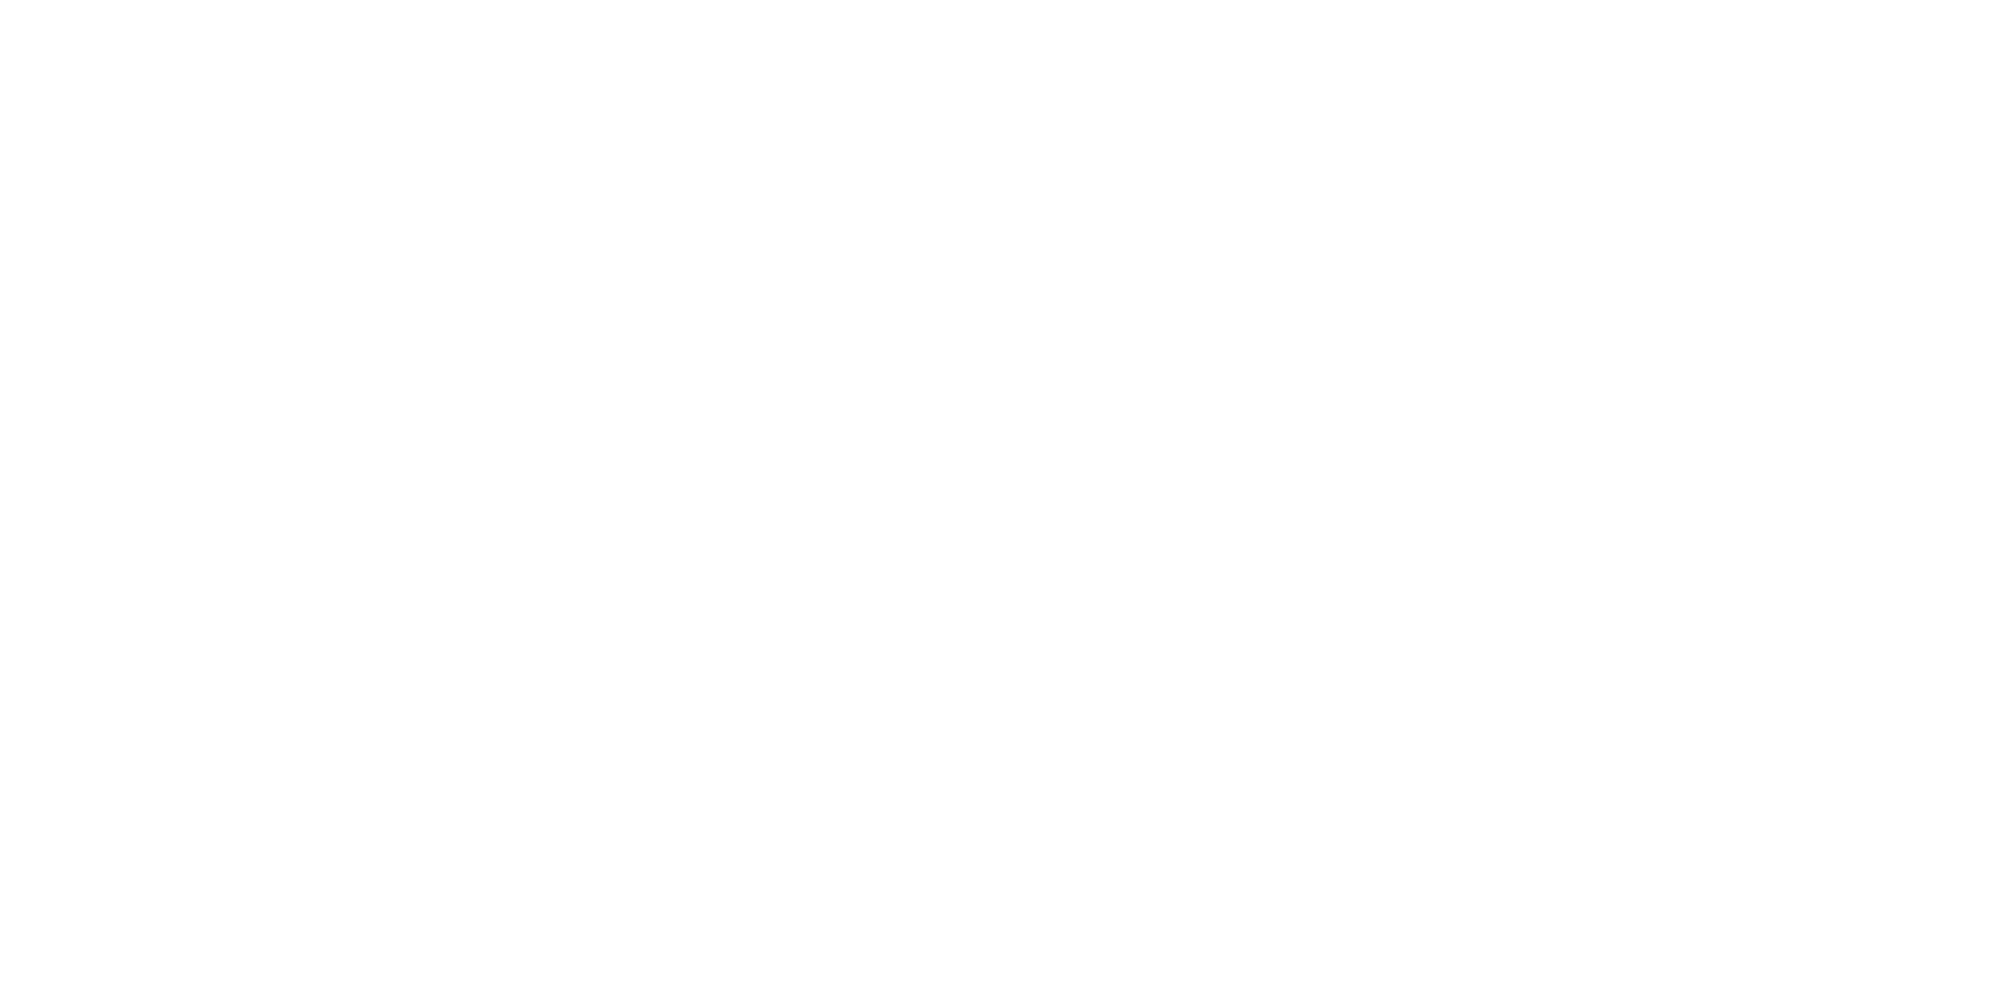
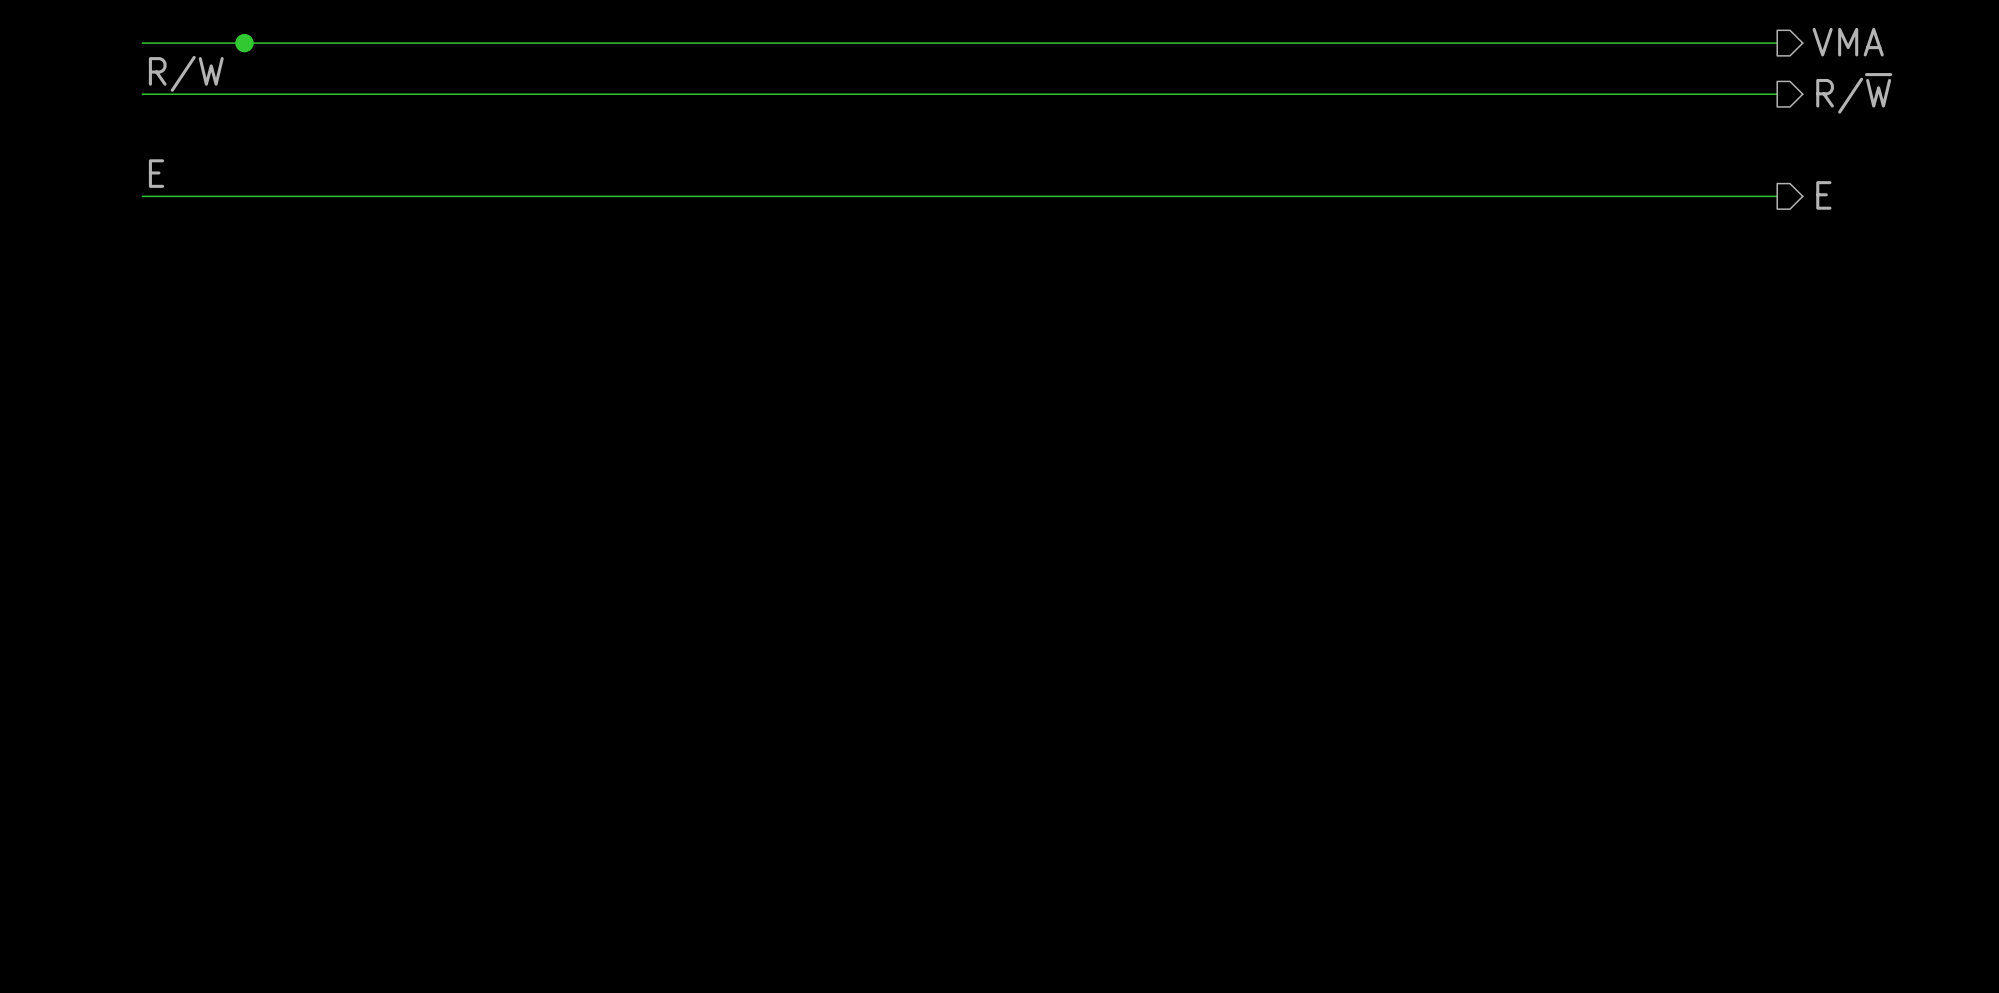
hierarchical label: none -> VMA (1848, 42)
wire: none -> (142, 43) (1777, 43)
junction: none -> (244, 43)
label: none -> R/W (186, 73)
hierarchical label: none -> R/~{W} (1854, 93)
wire: none -> (142, 94) (1777, 94)
label: none -> E (156, 173)
hierarchical label: none -> E (1823, 195)
wire: none -> (142, 196) (1777, 196)

